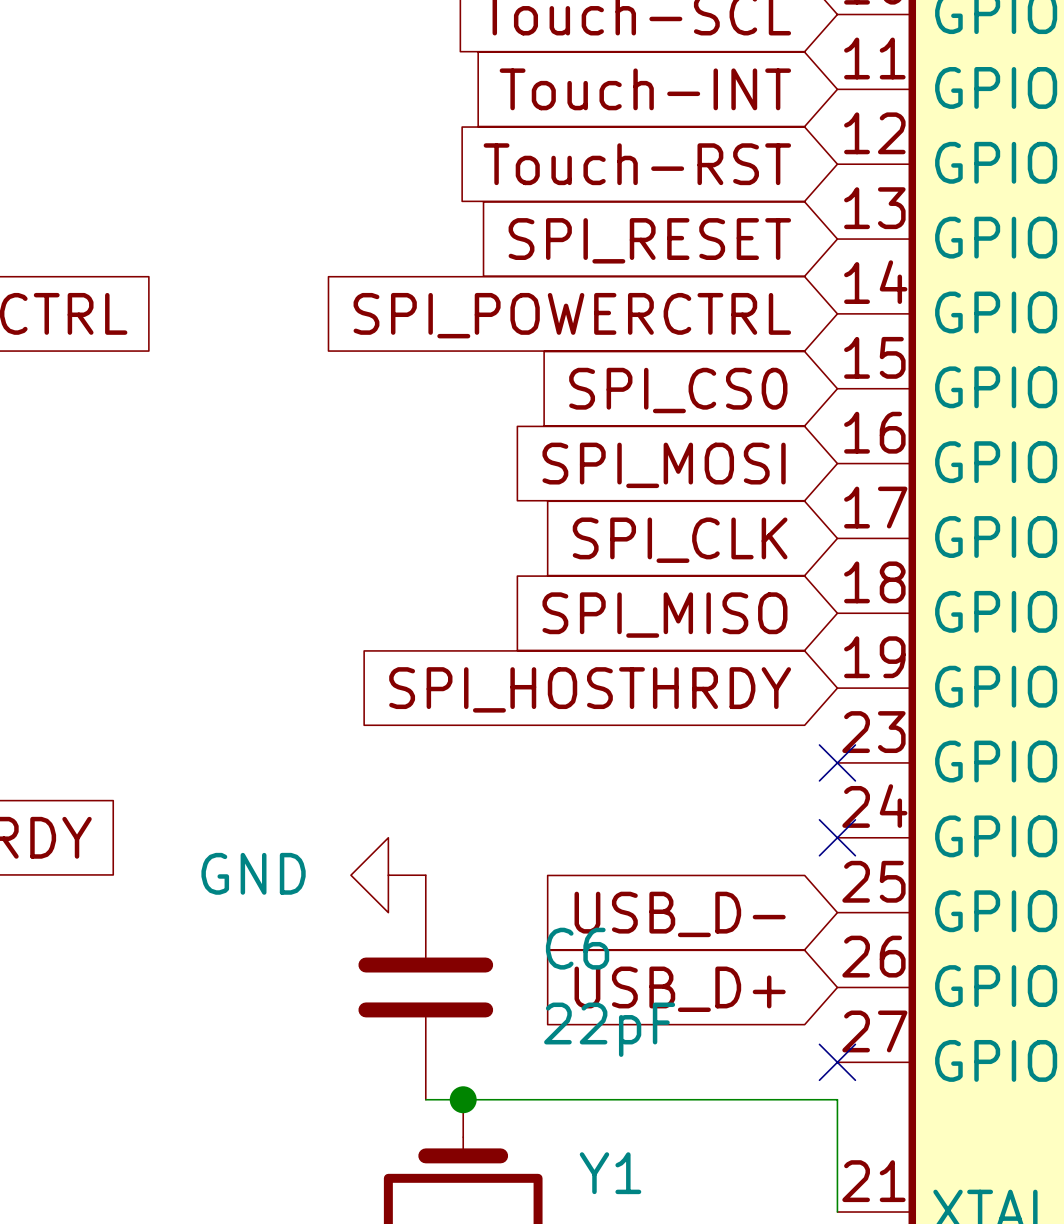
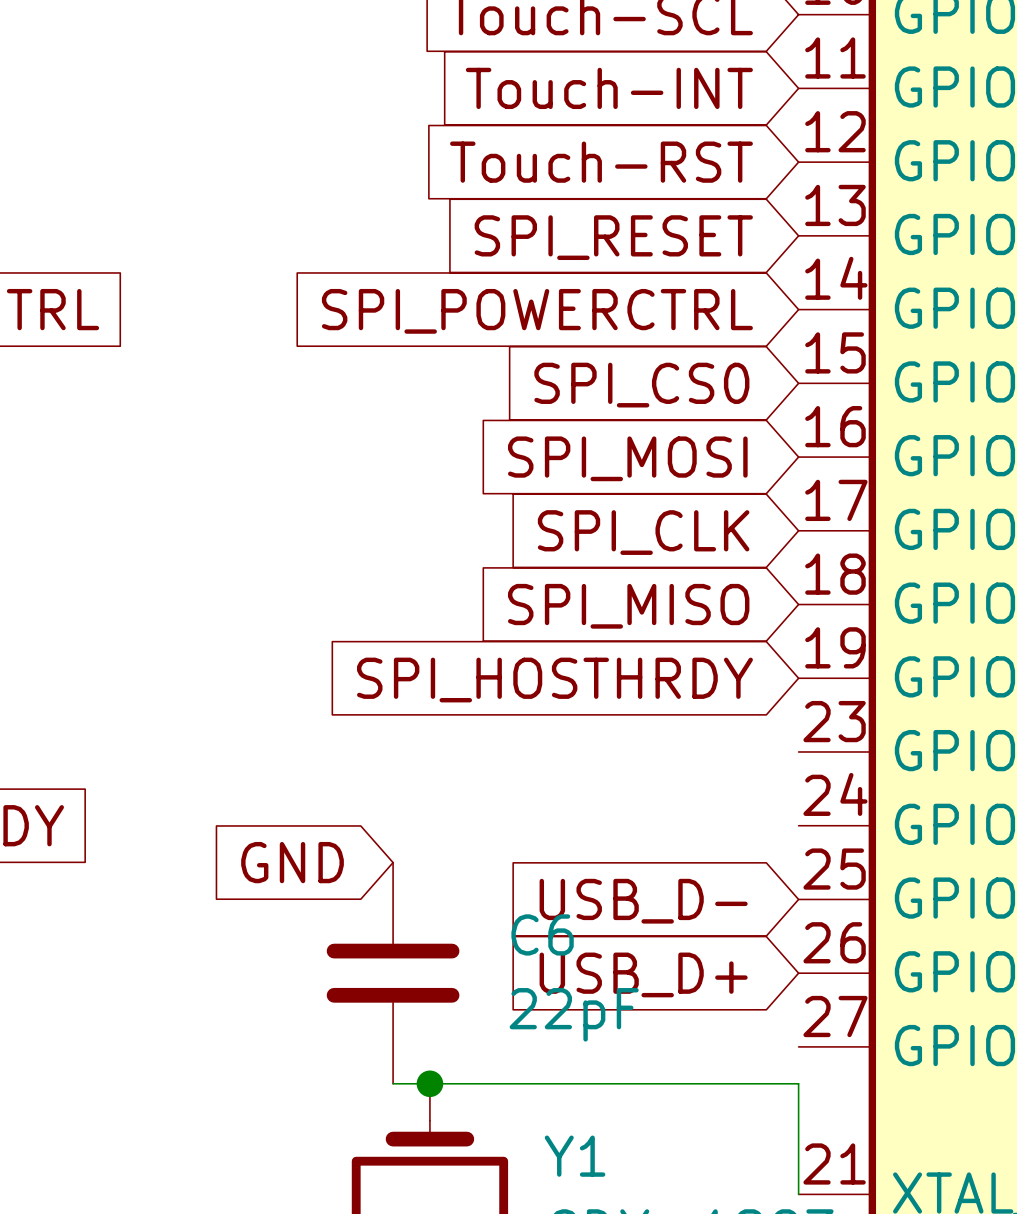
no-connect mark: (837, 762) -> none
no-connect mark: (837, 837) -> none
global label: none -> GND (292, 862)
power symbol: GND (388, 875) -> none
no-connect mark: (837, 1062) -> none

